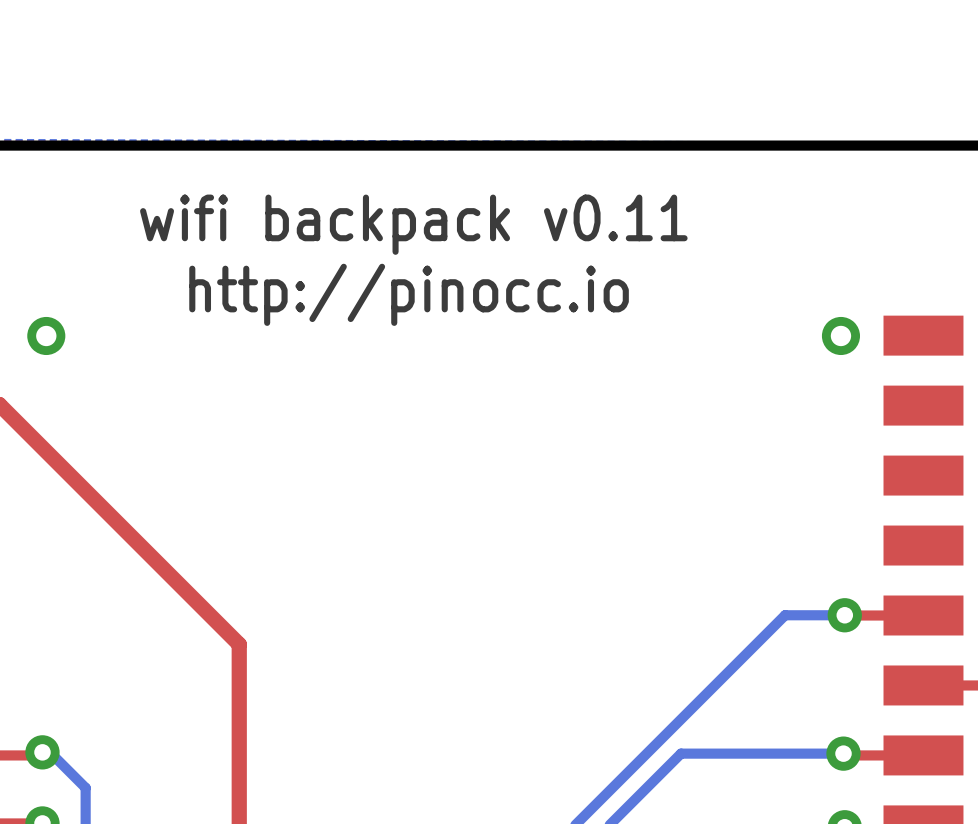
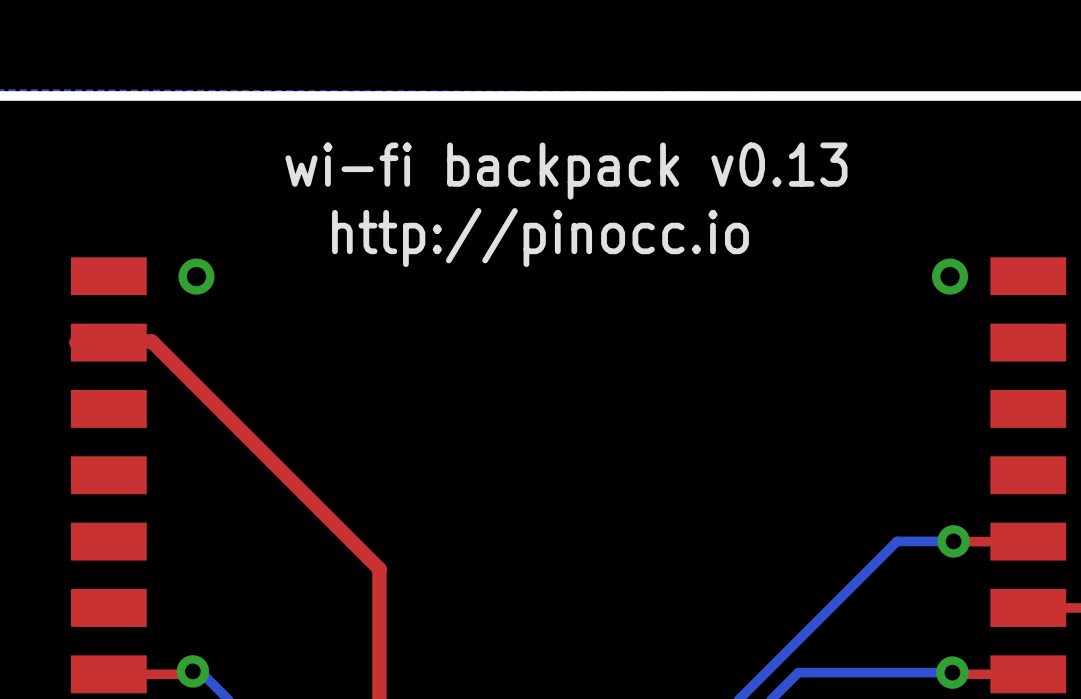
text: wifi backpack v0.11 (413, 224) -> wi-fi backpack v0.13 (566, 171)

